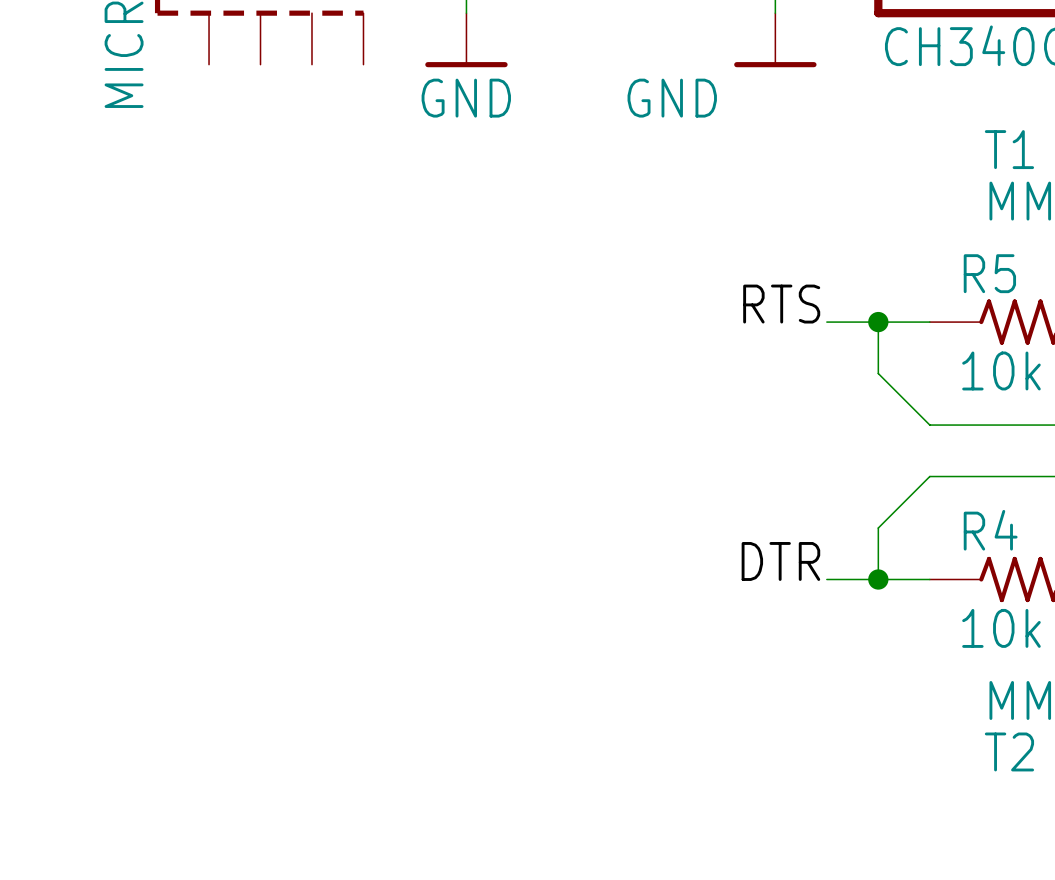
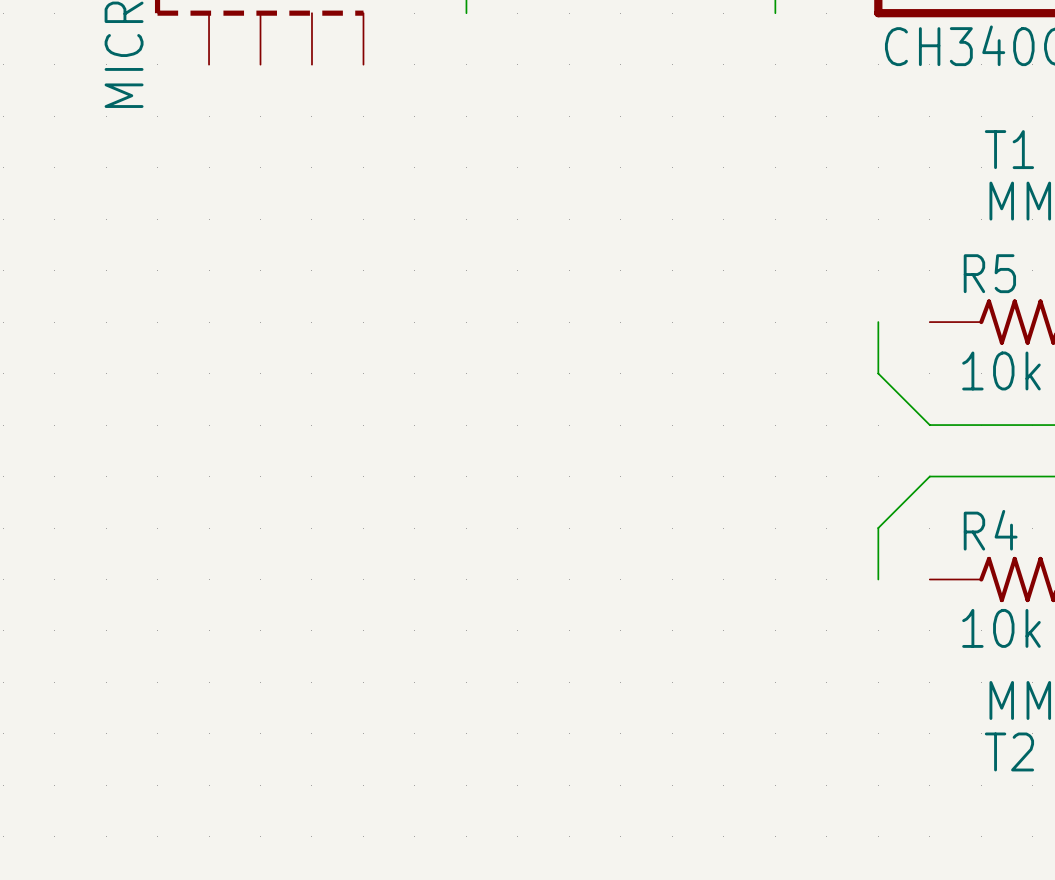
power symbol: GND (466, 40) -> none
power symbol: GND (775, 40) -> none
label: RTS (781, 304) -> none
wire: (826, 322) (929, 322) -> none
junction: (878, 322) -> none
label: DTR (780, 561) -> none
wire: (826, 579) (929, 579) -> none
junction: (878, 579) -> none

